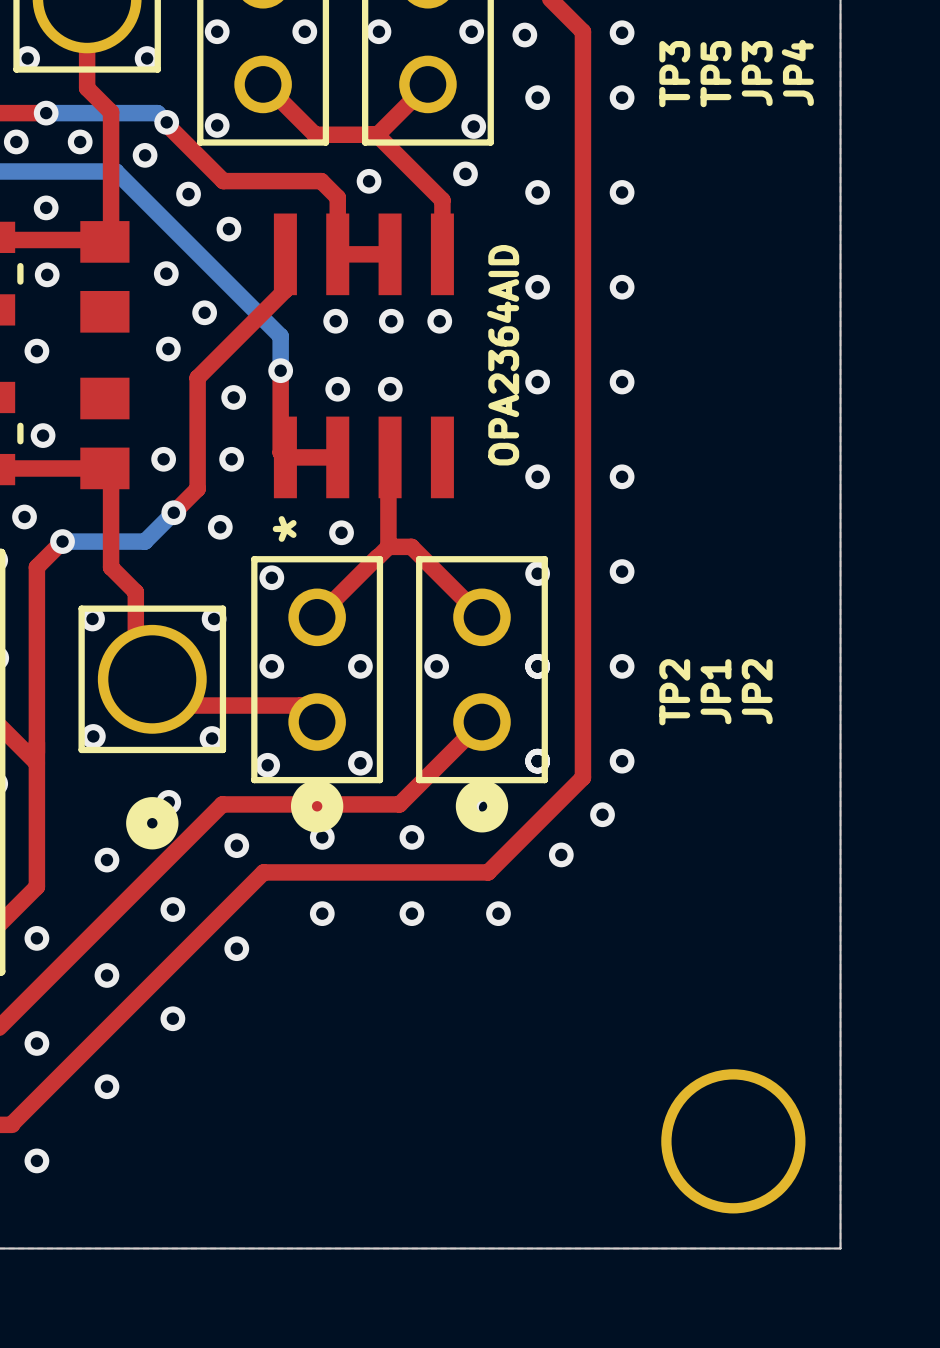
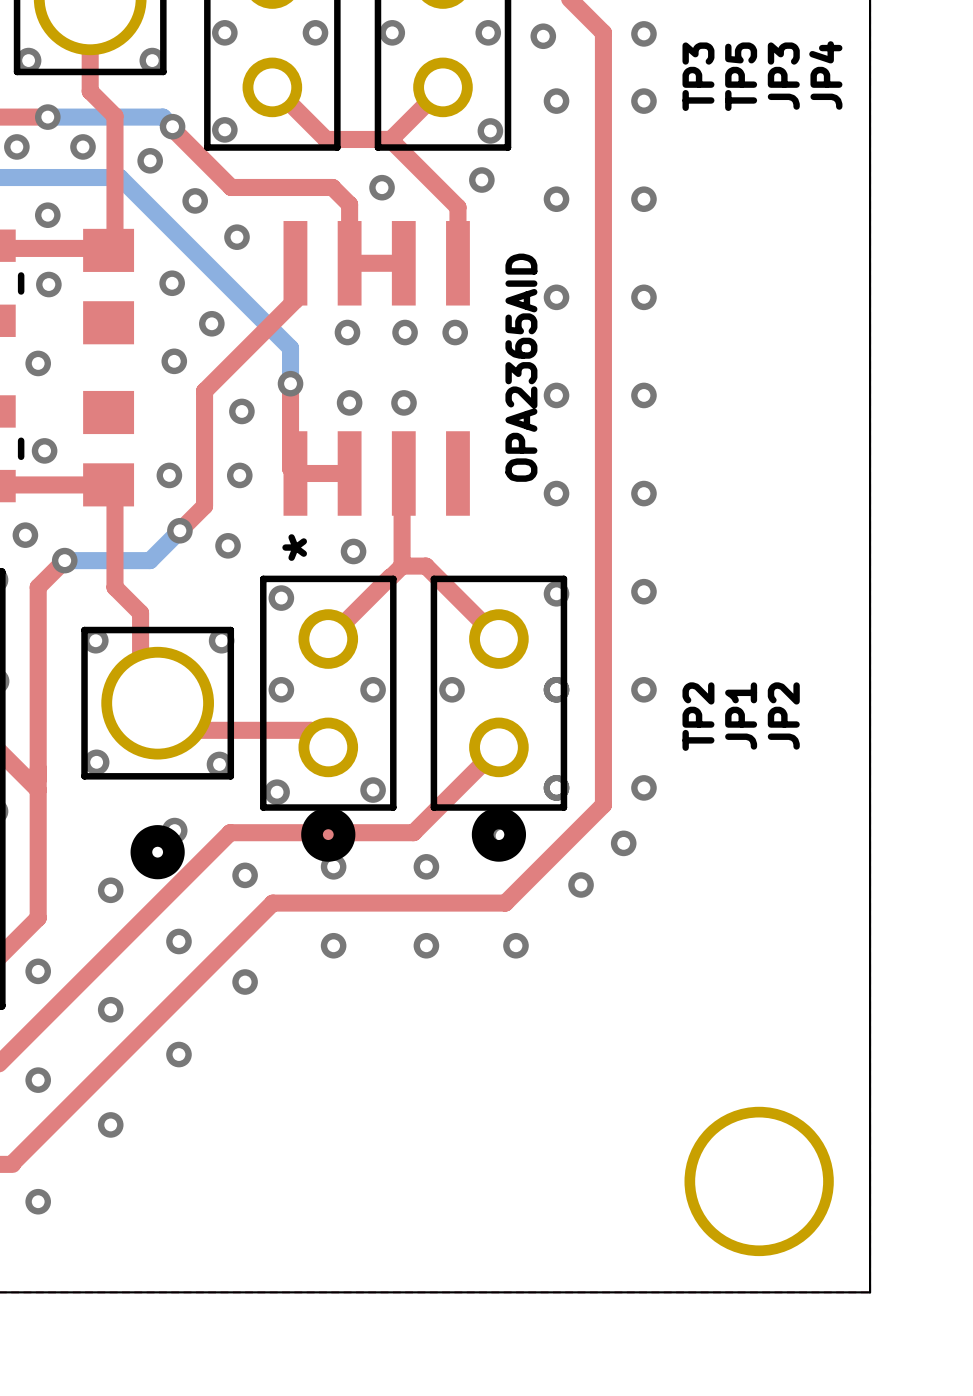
OPA2364AID name: OPA2364AID (503, 355) -> OPA2365AID (521, 367)

